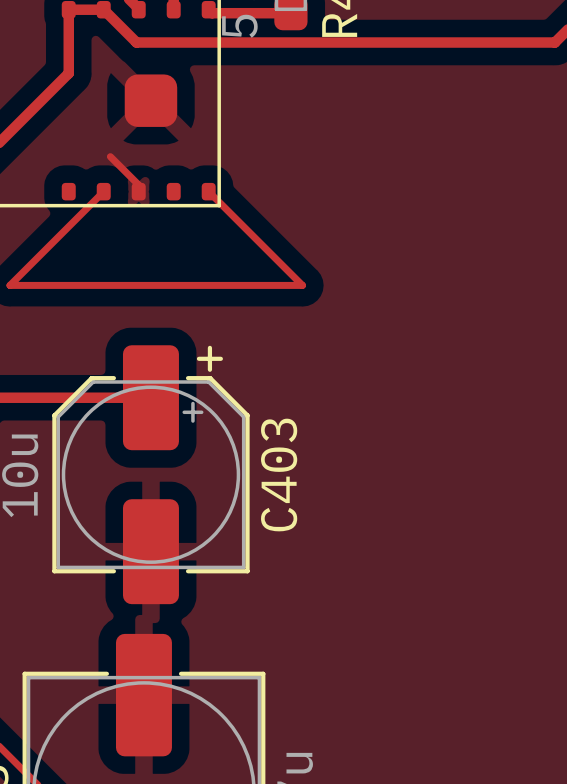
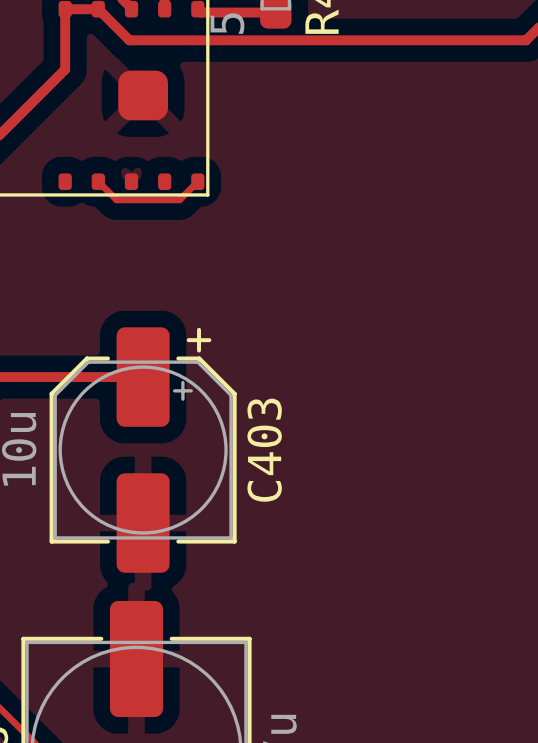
track: (110, 156) (138, 185) (138, 191) -> none
track: (103, 191) (9, 285) (302, 285) (208, 191) -> (98, 181) (116, 199) (179, 199) (197, 181)

